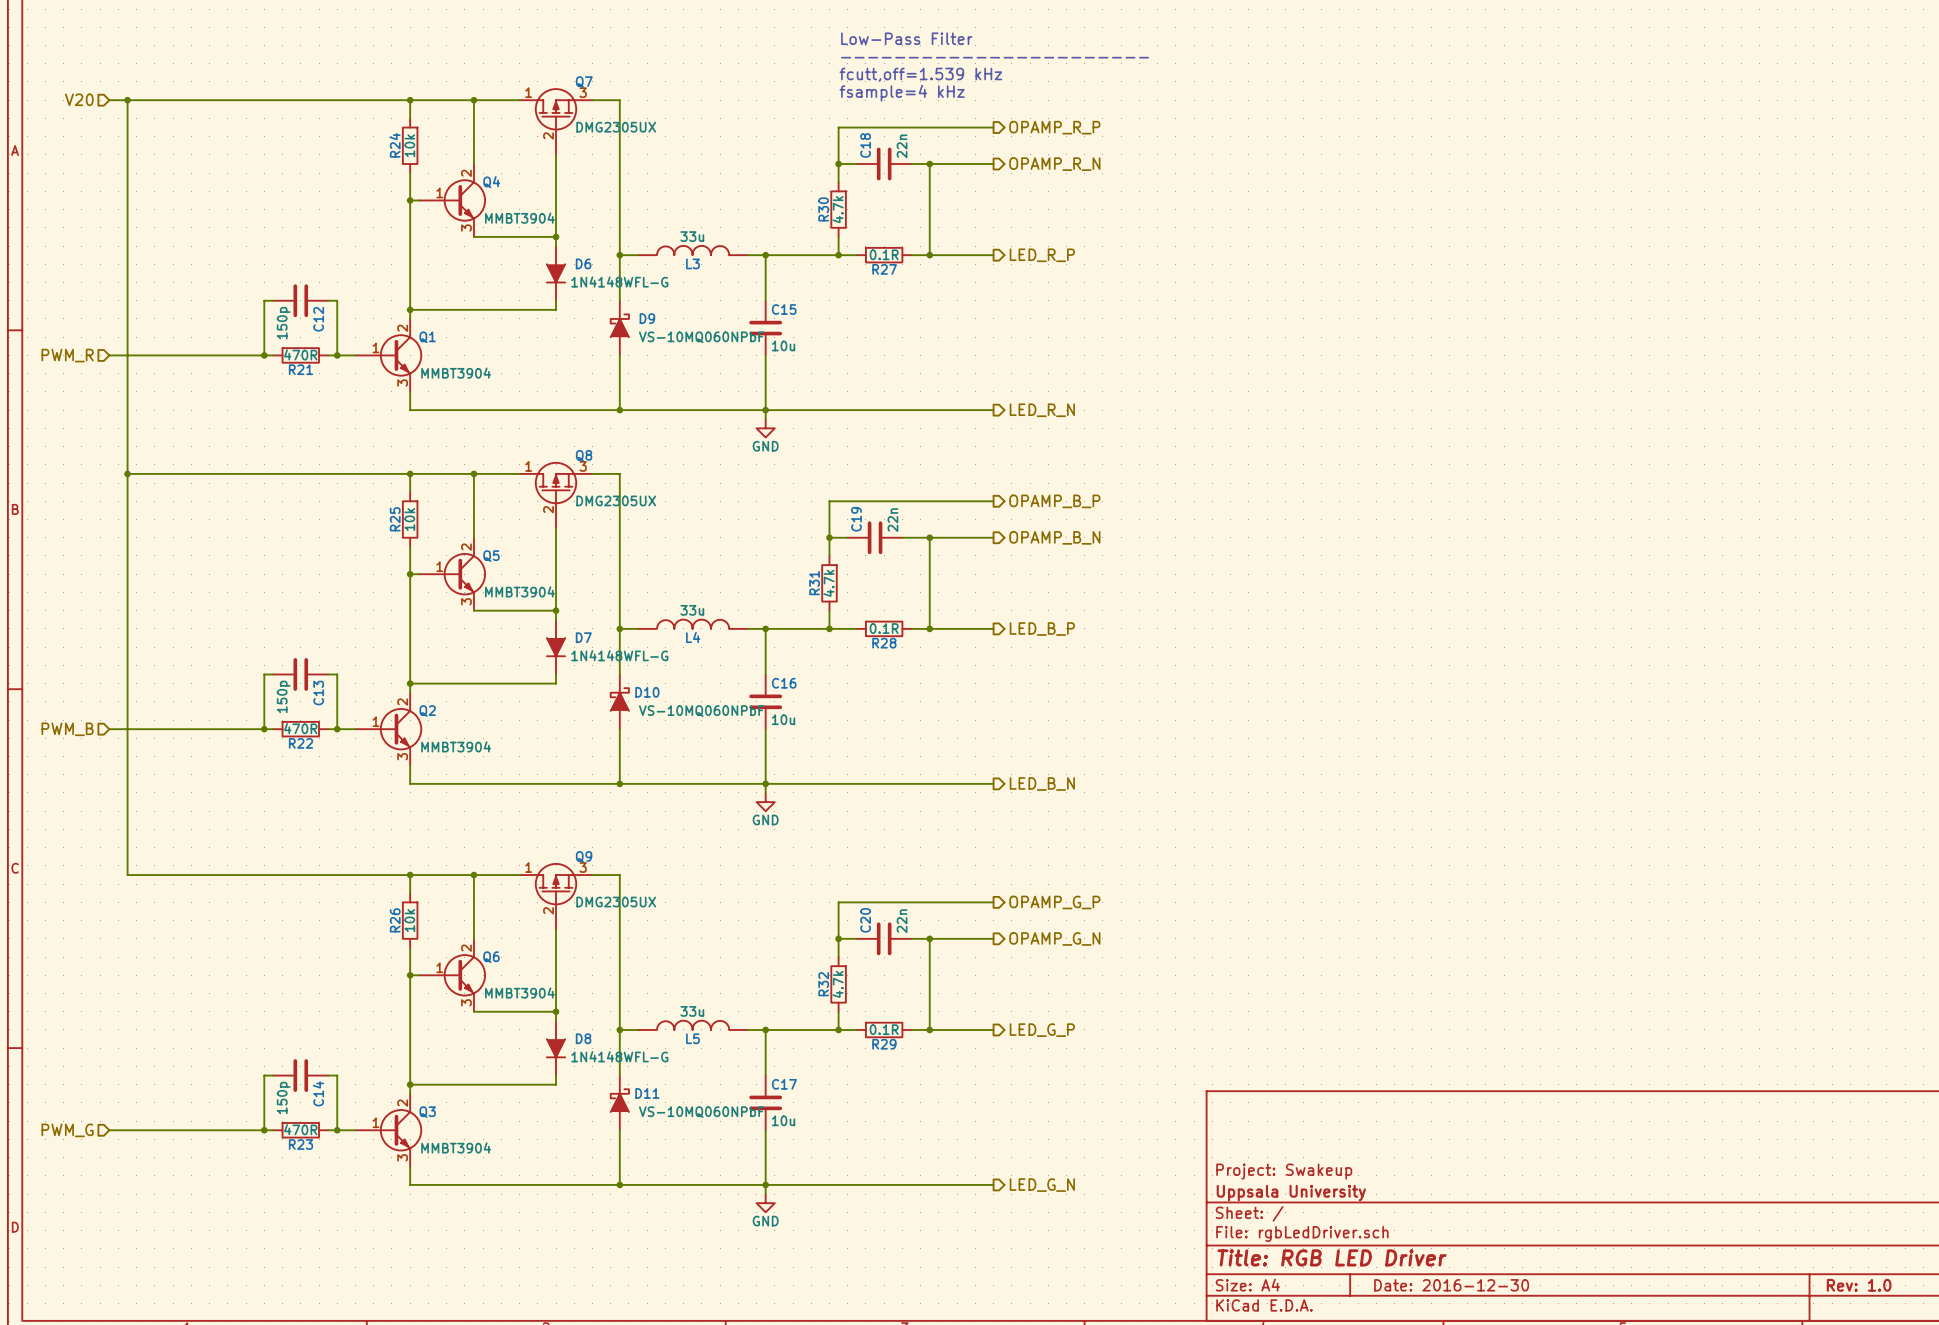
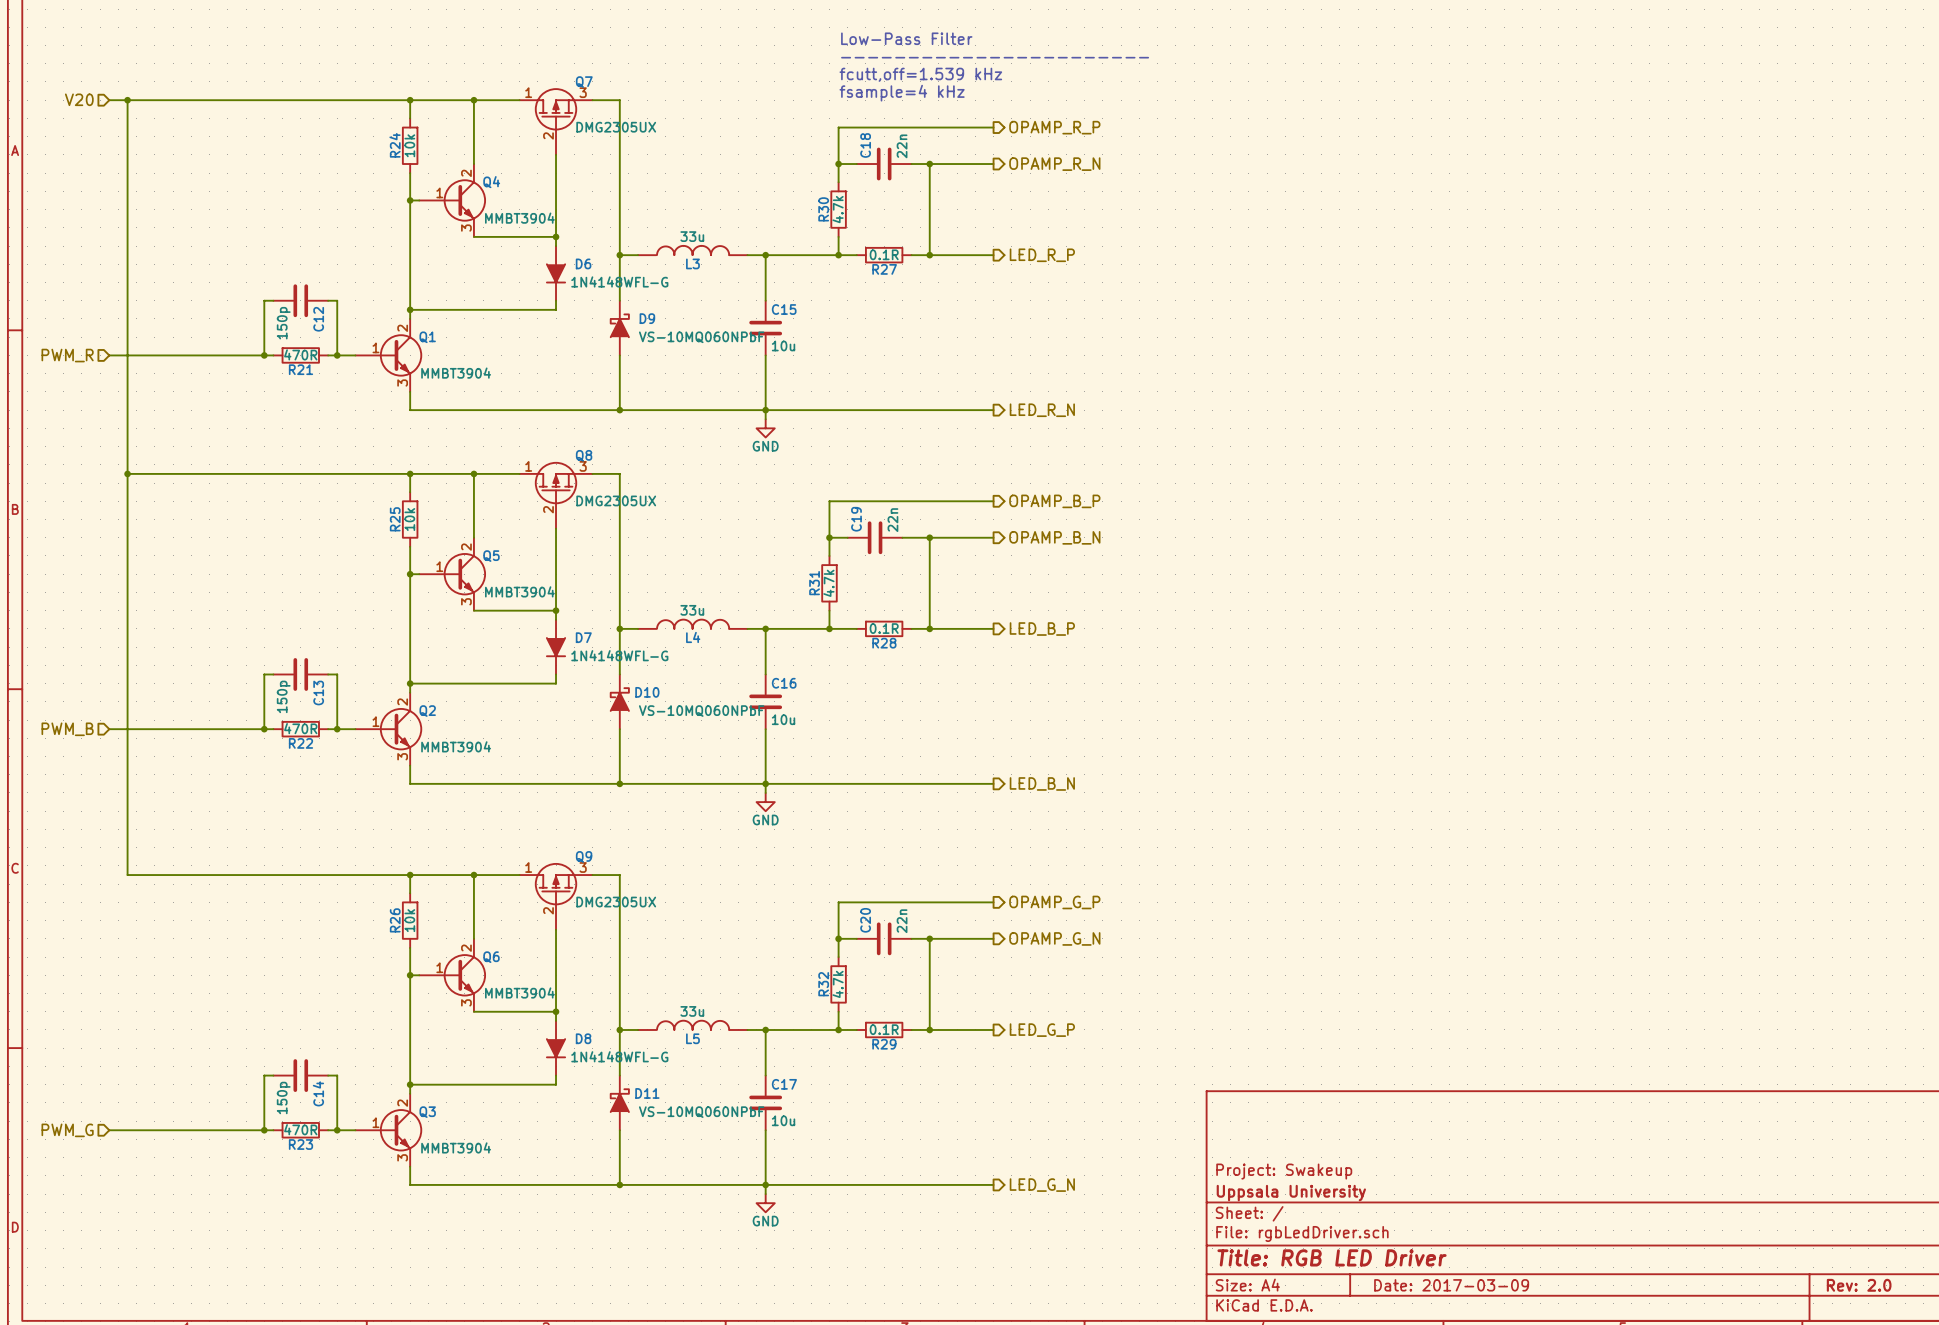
title block: Date: 2016-12-30 (1451, 1285) -> Date: 2017-03-09 (1451, 1285)
title block: Rev: 1.0 (1859, 1285) -> Rev: 2.0 (1859, 1285)

